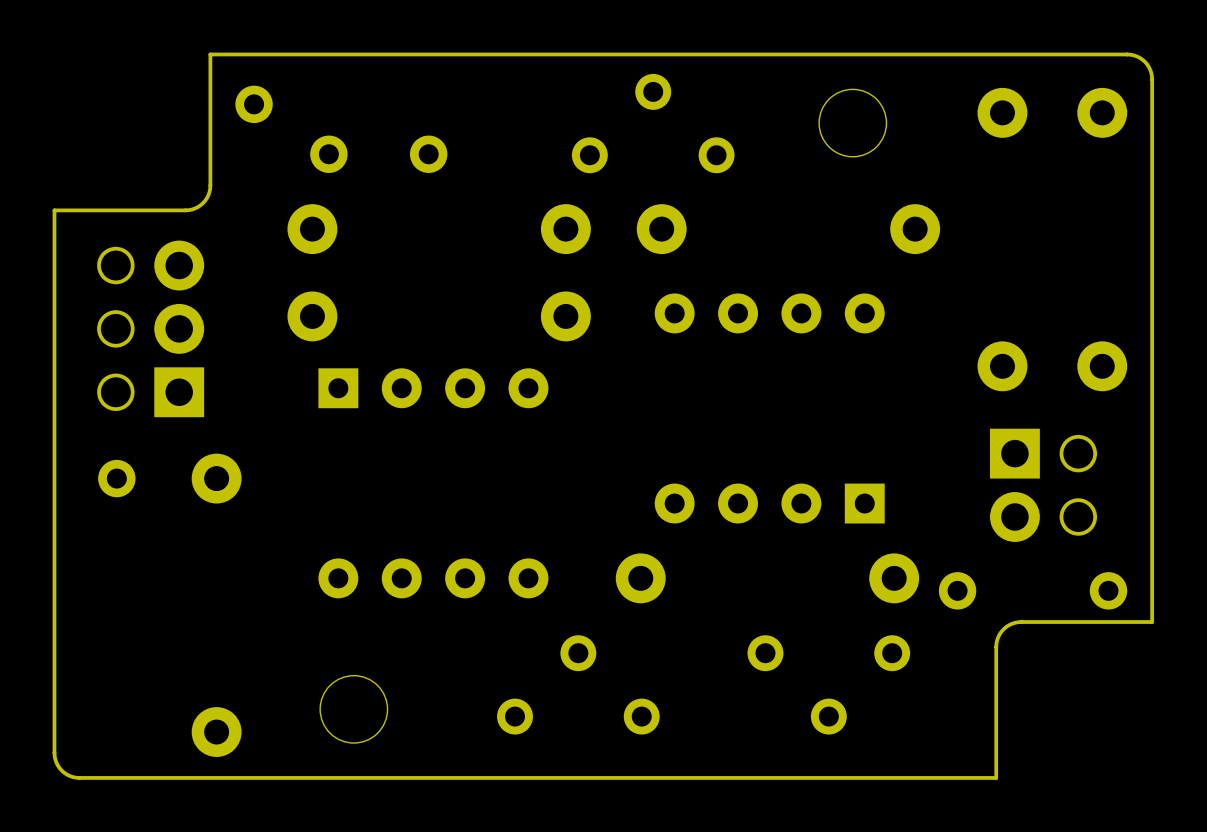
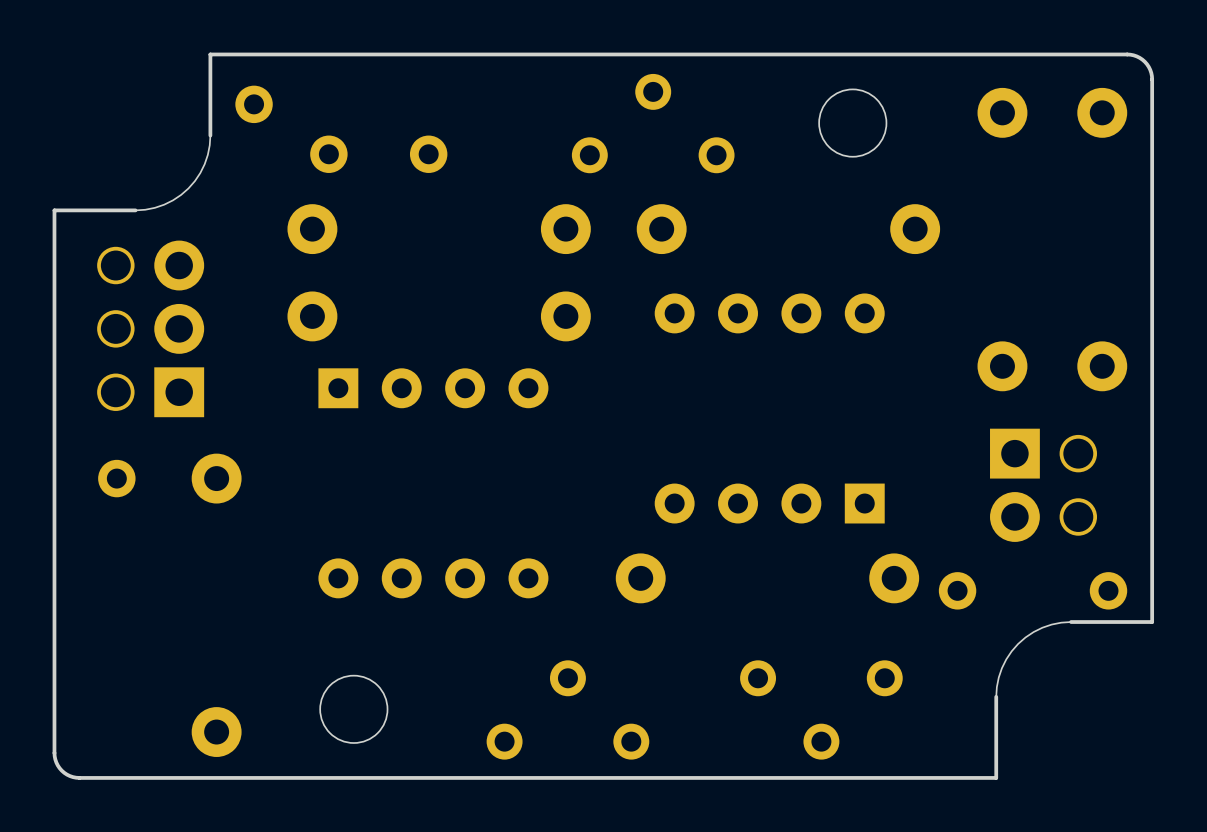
board edge: (210, 135) (210, 188) (203, 203) (188, 210) (135, 210) -> (210, 135) (204, 164) (188, 188) (164, 204) (135, 210)
board edge: (1071, 622) (1017, 622) (1003, 629) (996, 643) (996, 696) -> (1071, 622) (1042, 627) (1018, 643) (1001, 668) (996, 696)
part position: (578, 684) -> (567, 709)
part position: (828, 684) -> (821, 709)

